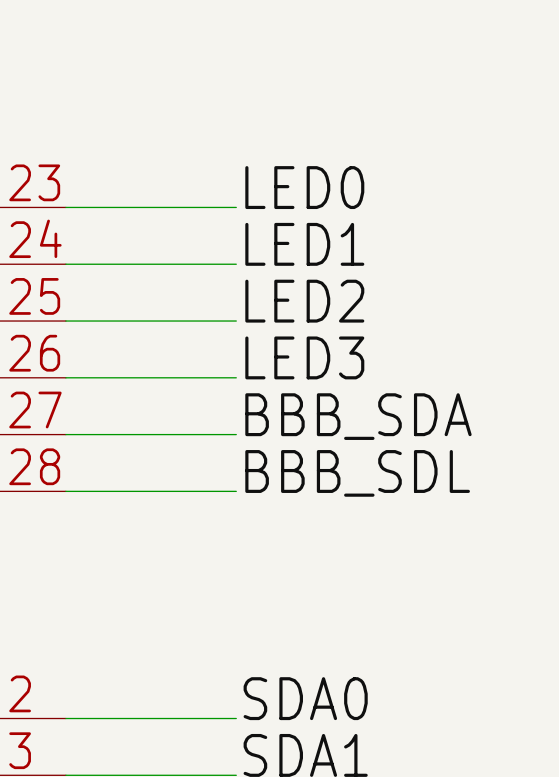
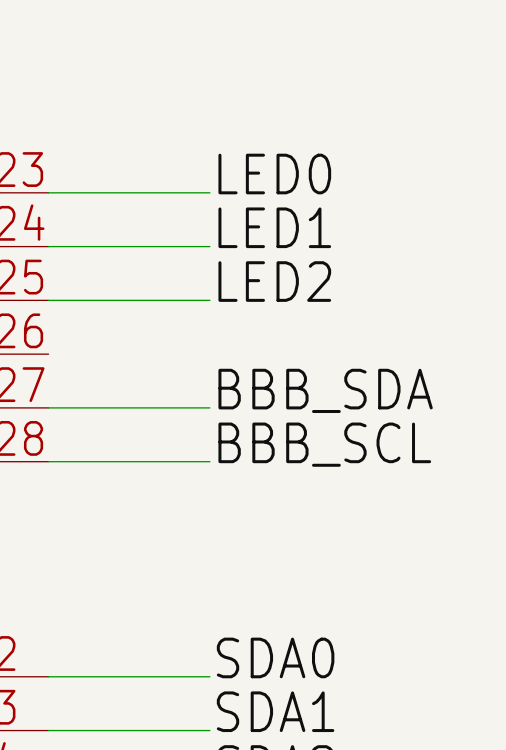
label: LED3 (304, 357) -> none
wire: (65, 377) (236, 377) -> none
label: BBB_SDL (357, 473) -> BBB_SCL (324, 444)

